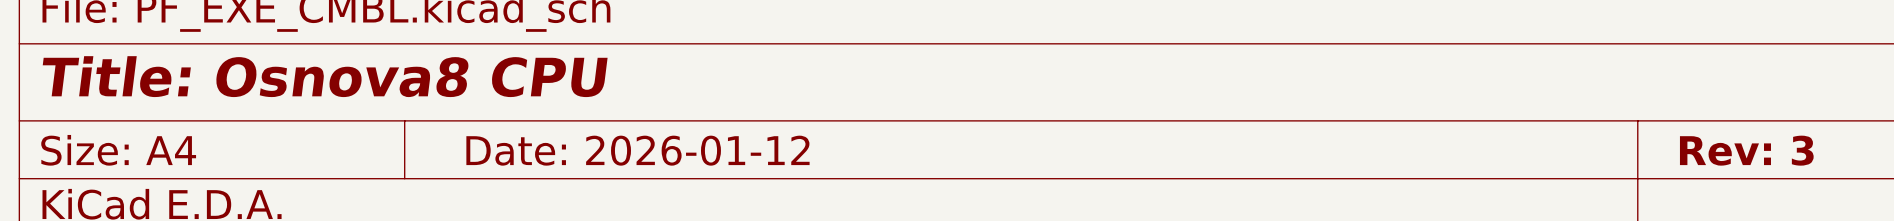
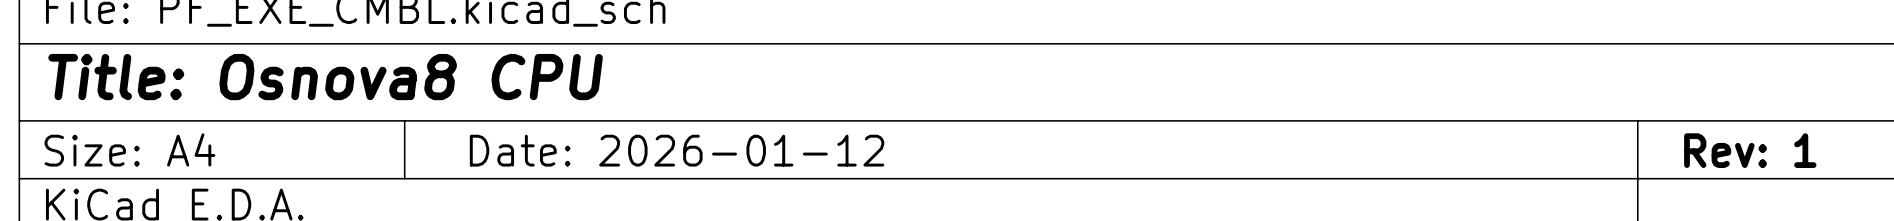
title block: Rev: 3 (1746, 150) -> Rev: 1 (1750, 150)

